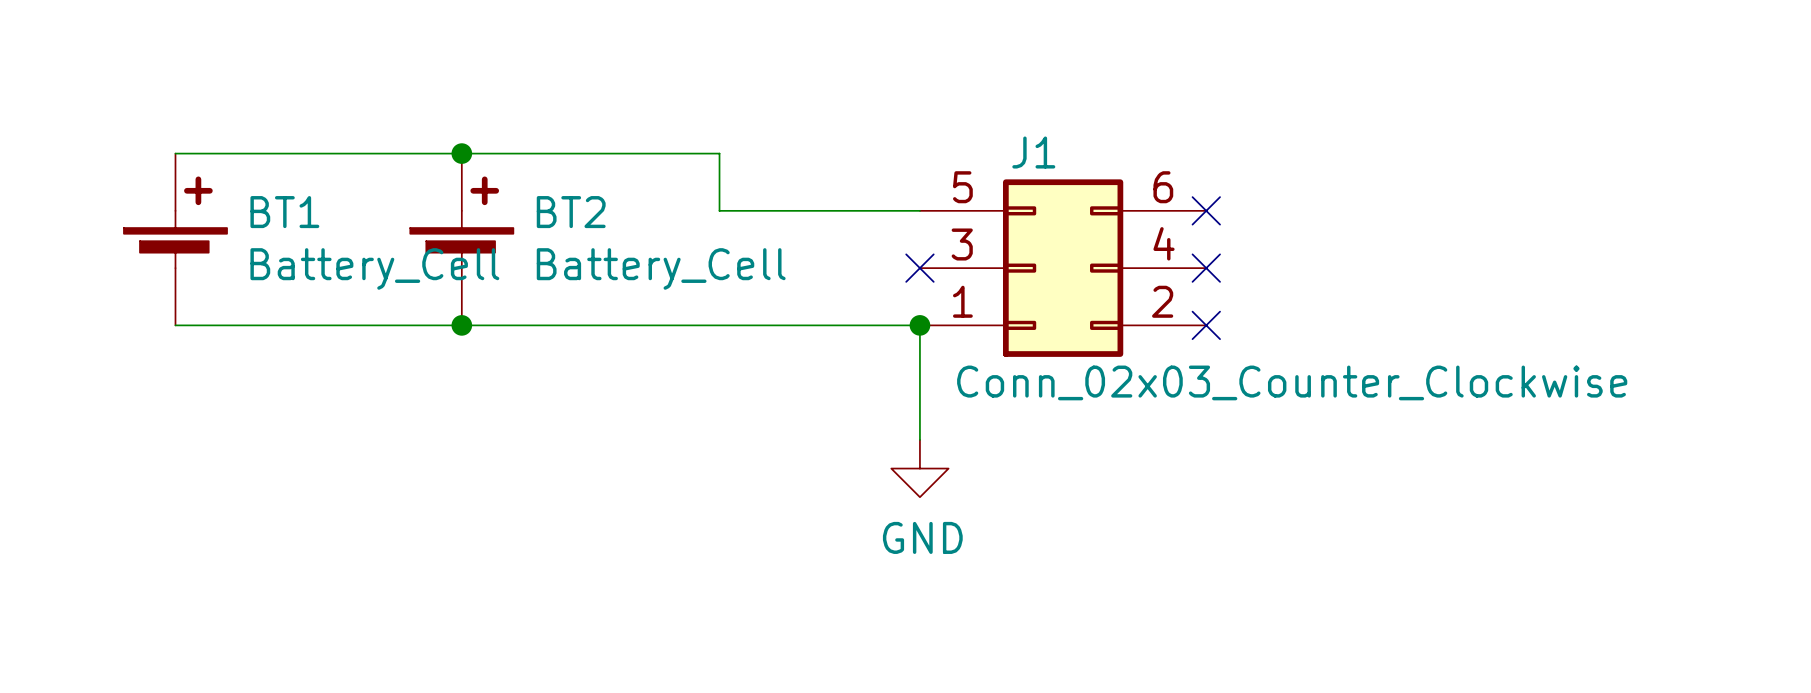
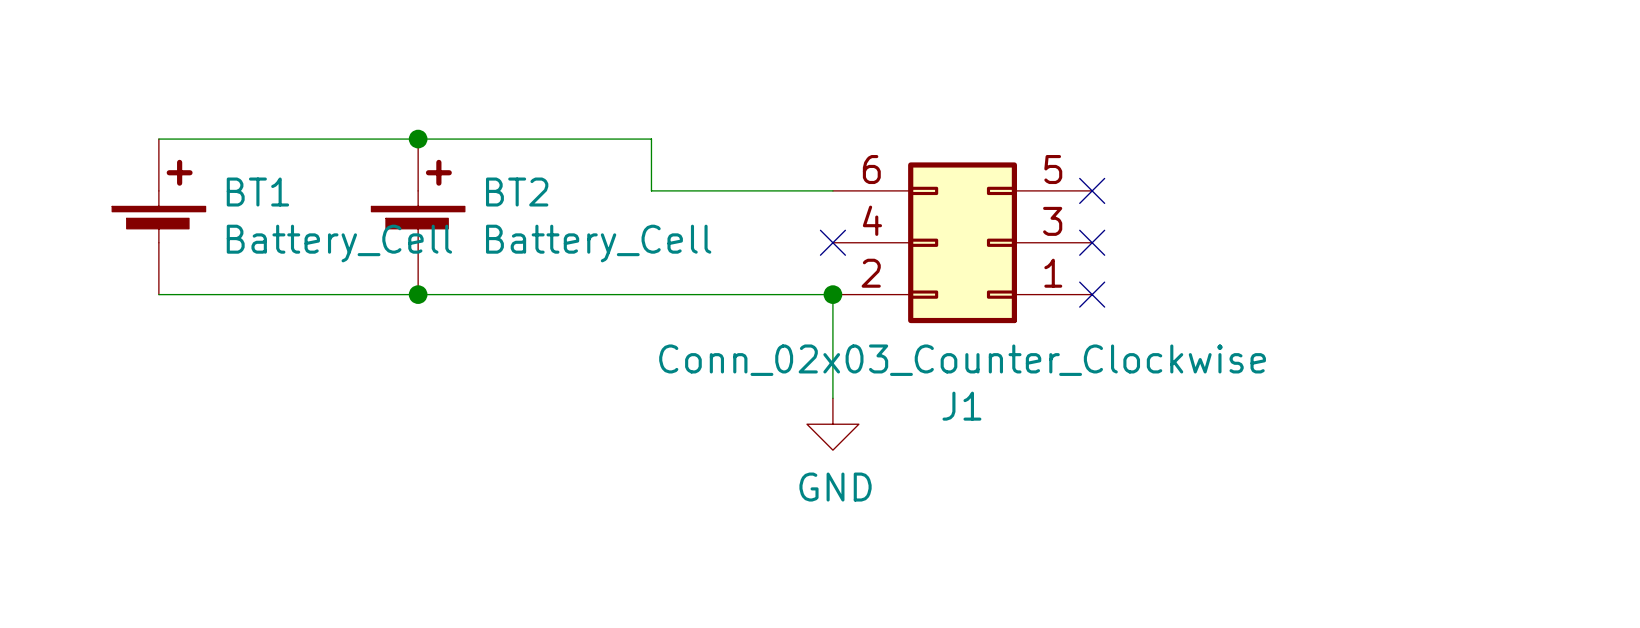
J1 name position: J1 (1033, 152) -> J1 (961, 406)
J1 flip: as is (1063, 268) -> left-right (962, 242)
J1 value position: Conn_02x03_Counter_Clockwise (1292, 382) -> Conn_02x03_Counter_Clockwise (962, 360)

